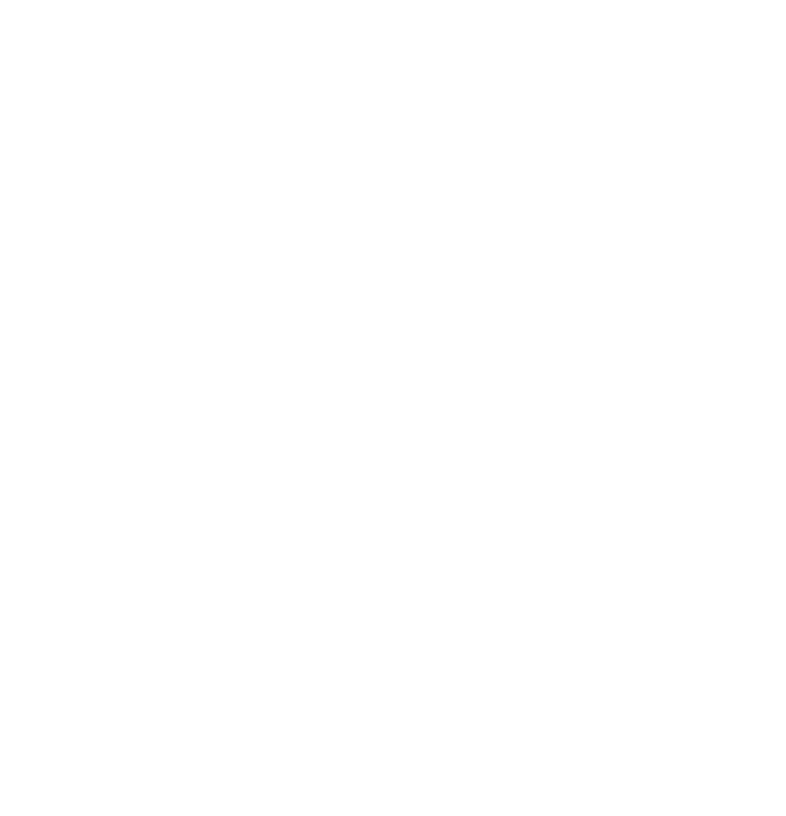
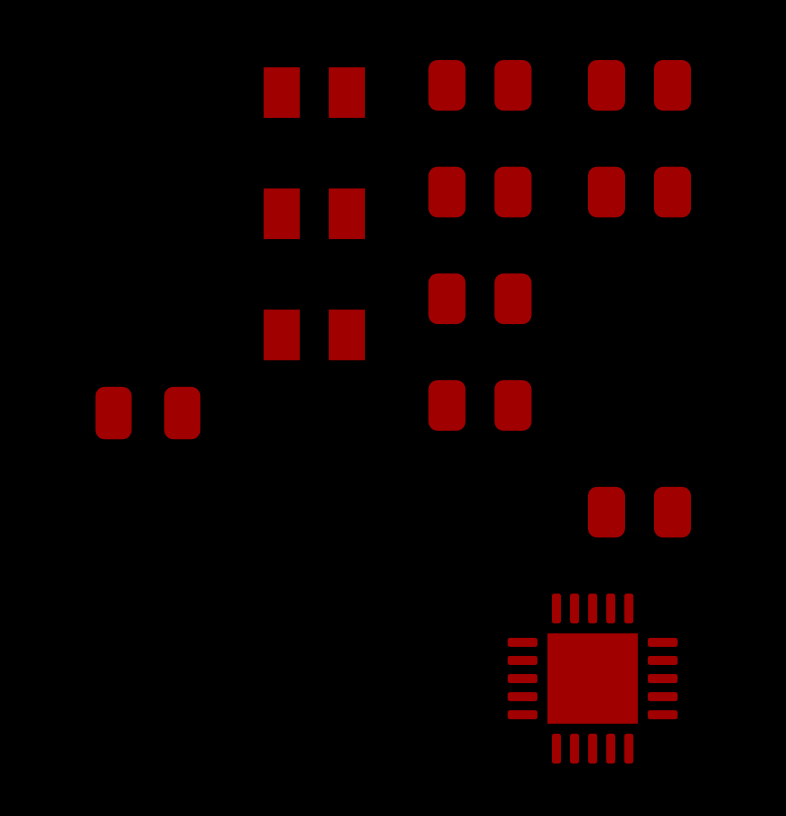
part: none -> (479, 85)
part: none -> (639, 85)
part: none -> (314, 92)
part: none -> (479, 192)
part: none -> (639, 192)
part: none -> (314, 213)
part: none -> (479, 298)
part: none -> (314, 334)
part: none -> (479, 405)
part: none -> (147, 413)
part: none -> (639, 512)
part: none -> (592, 678)

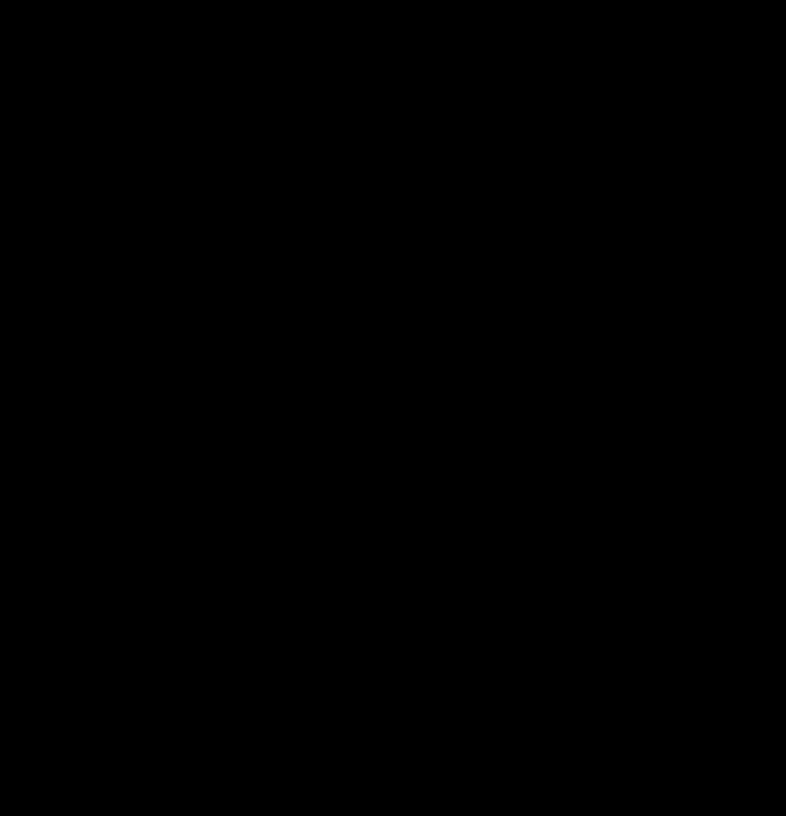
part: (479, 85) -> none
part: (639, 85) -> none
part: (314, 92) -> none
part: (479, 192) -> none
part: (639, 192) -> none
part: (314, 213) -> none
part: (479, 298) -> none
part: (314, 334) -> none
part: (479, 405) -> none
part: (147, 413) -> none
part: (639, 512) -> none
part: (592, 678) -> none

